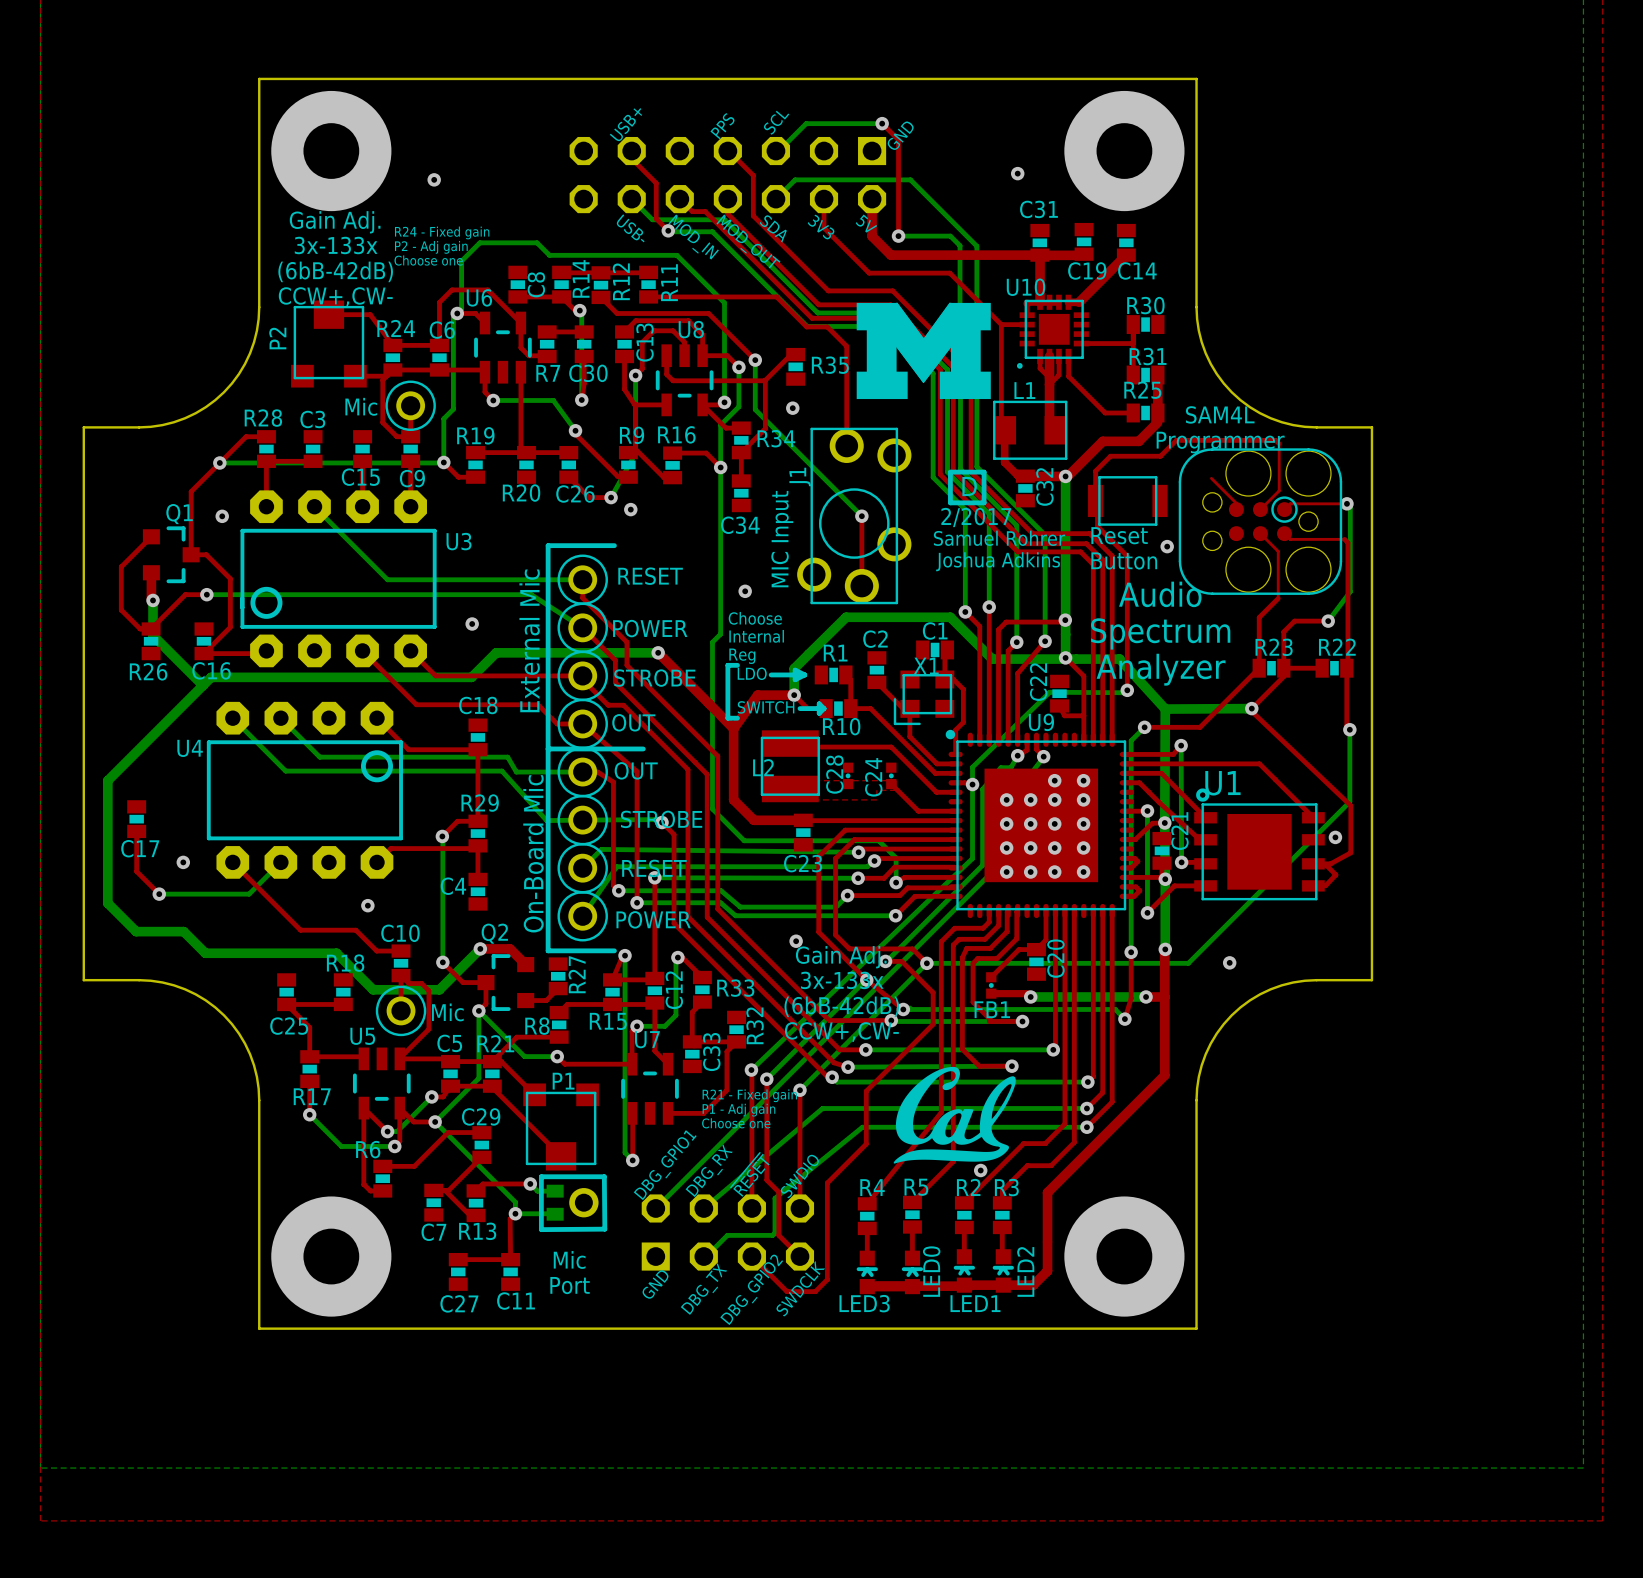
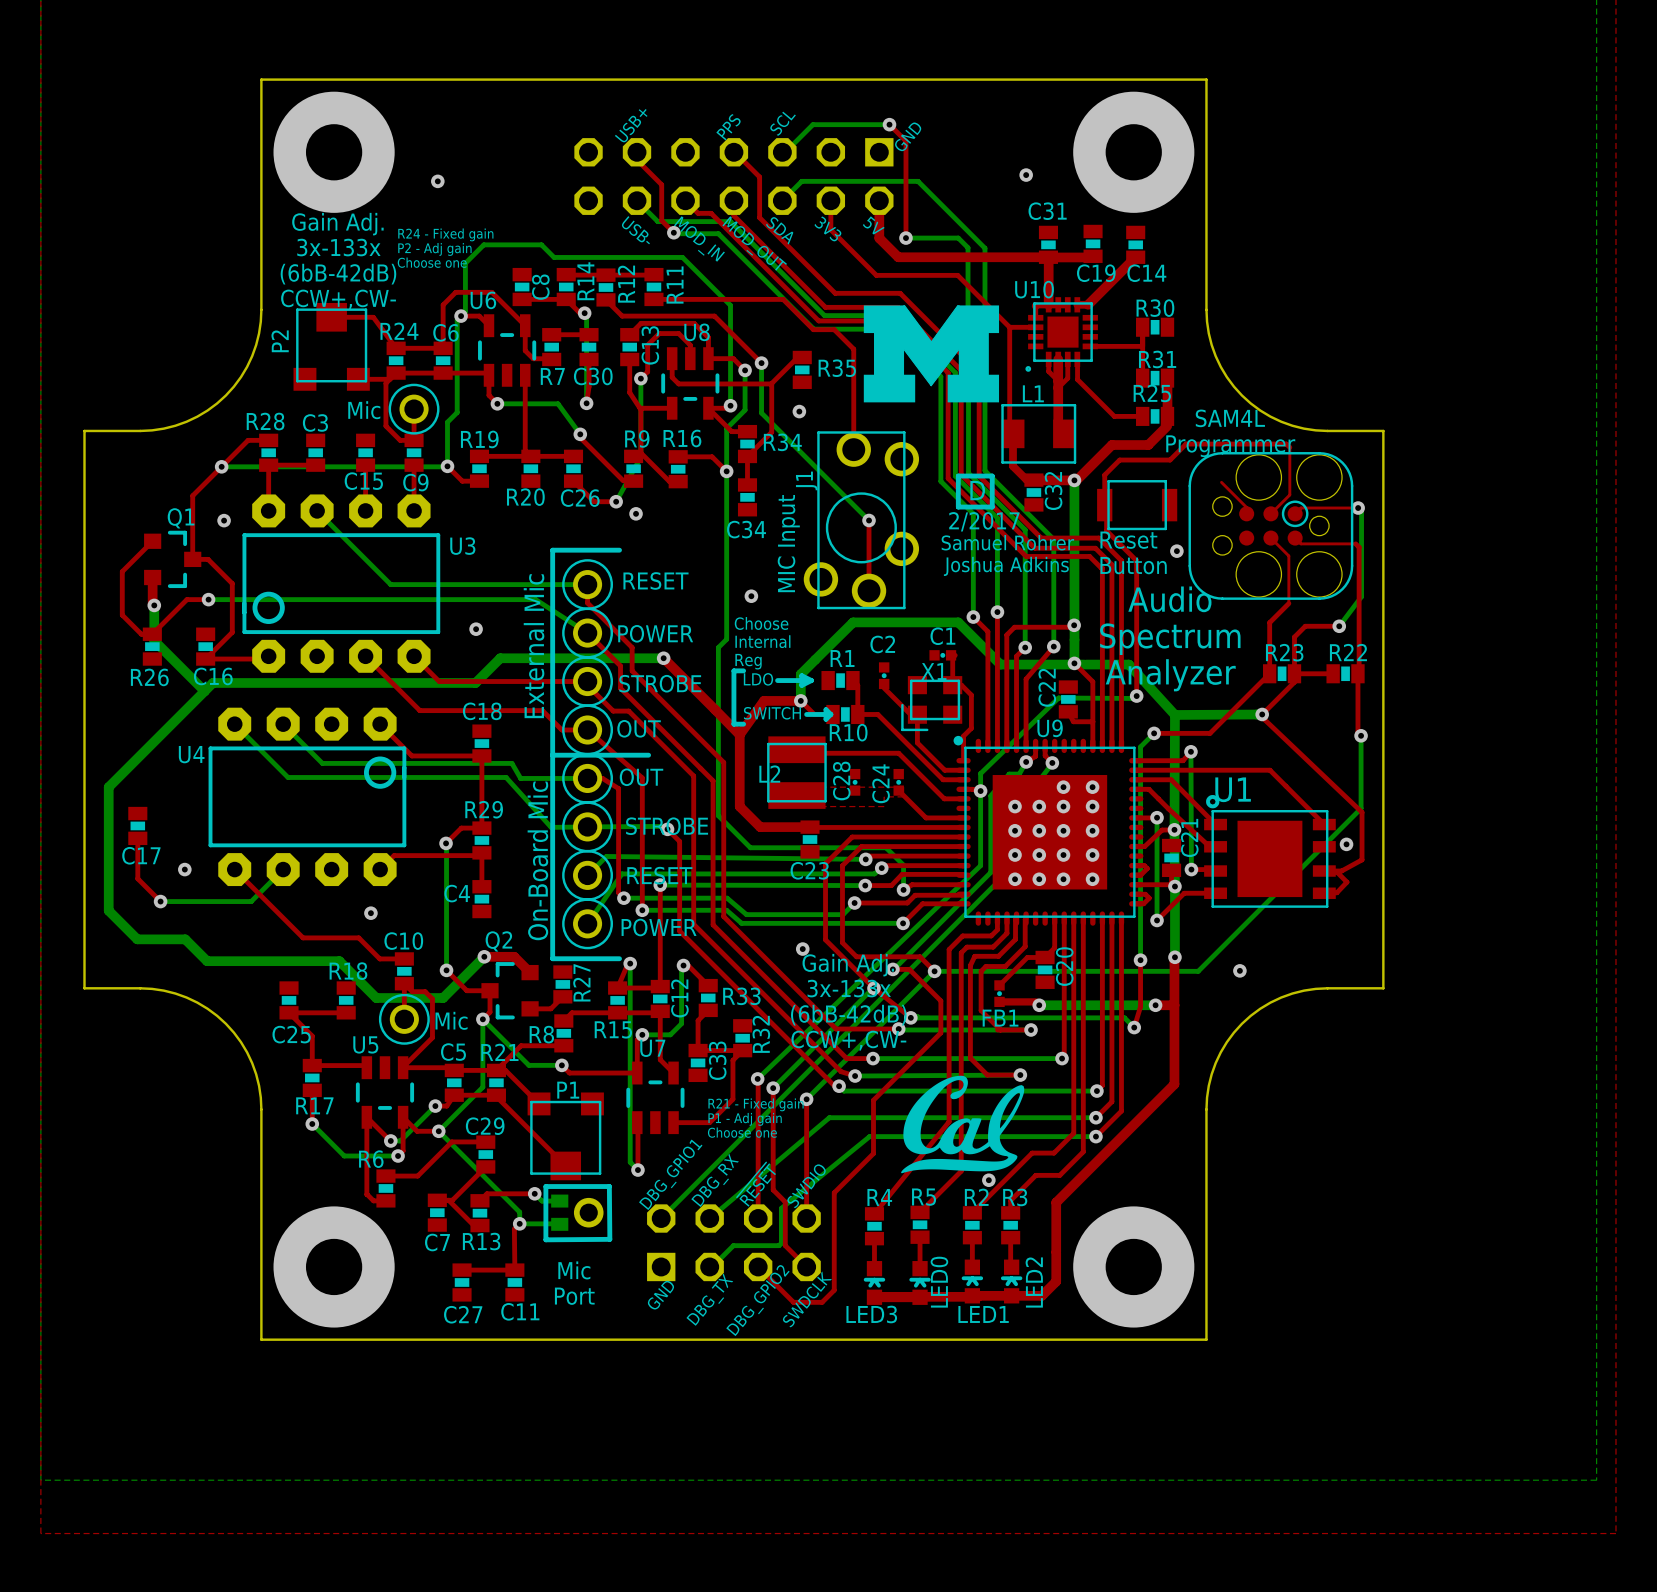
C1 footprint: [916, 640, 954, 660] -> [929, 650, 957, 661]
C2 footprint: [867, 651, 887, 690] -> [878, 662, 890, 690]

